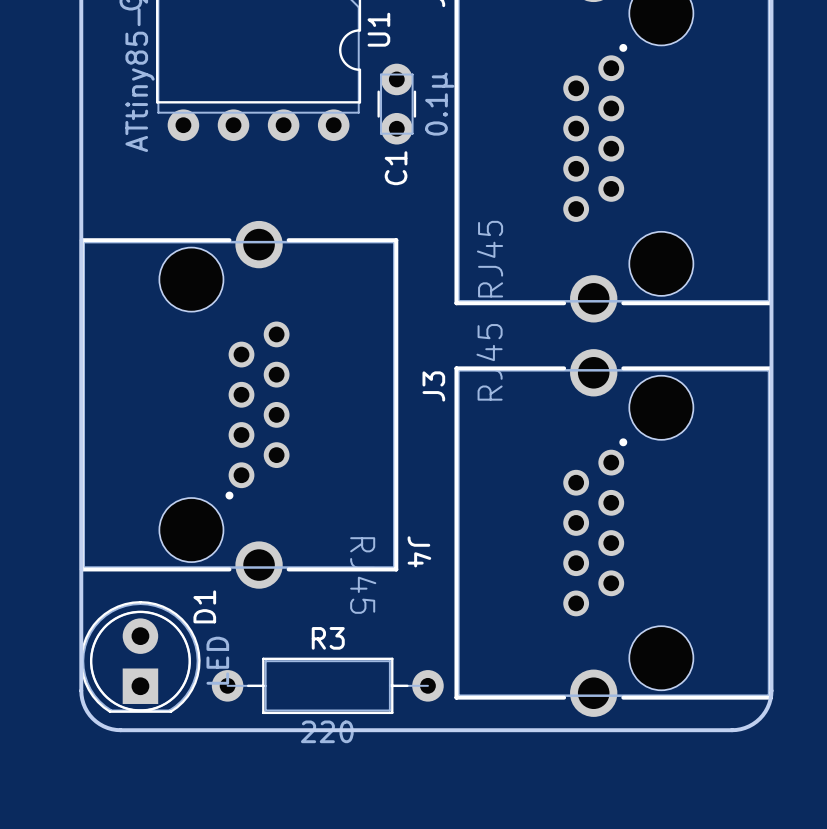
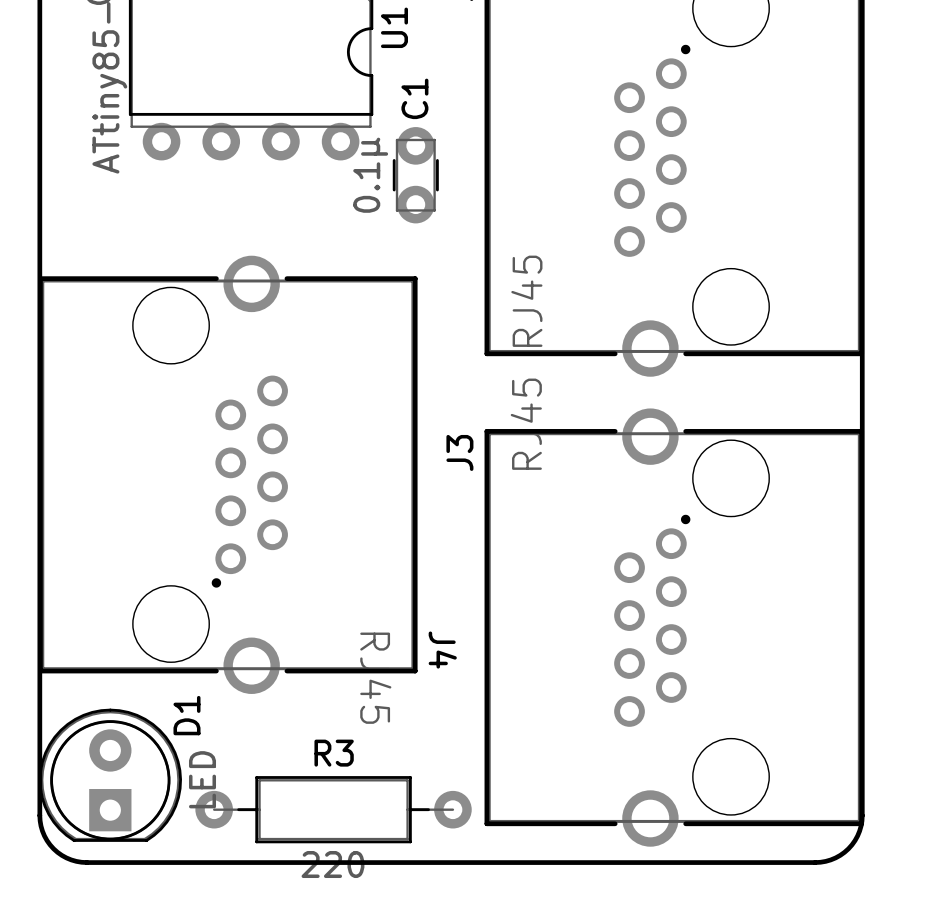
C1 position: (396, 104) -> (415, 175)
C1 value position: 0.1μ (439, 104) -> 0.1μ (370, 175)
C1 name position: C1 (396, 168) -> C1 (414, 98)

